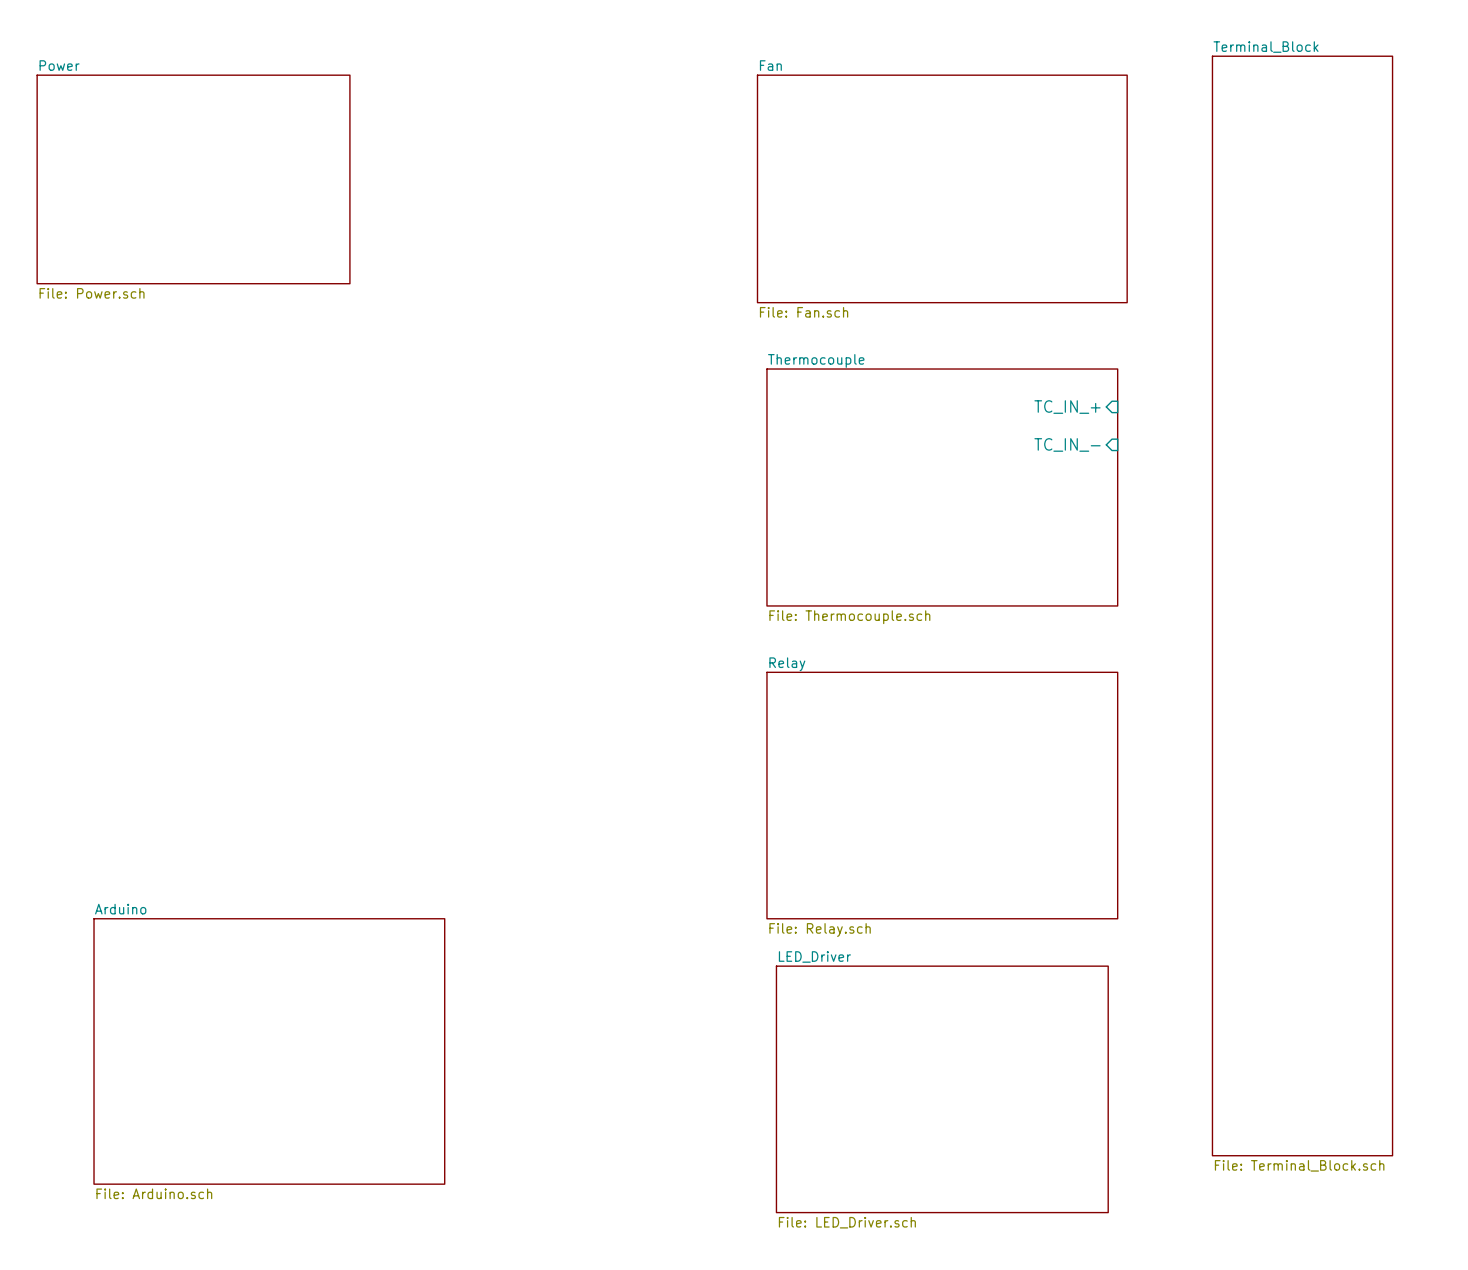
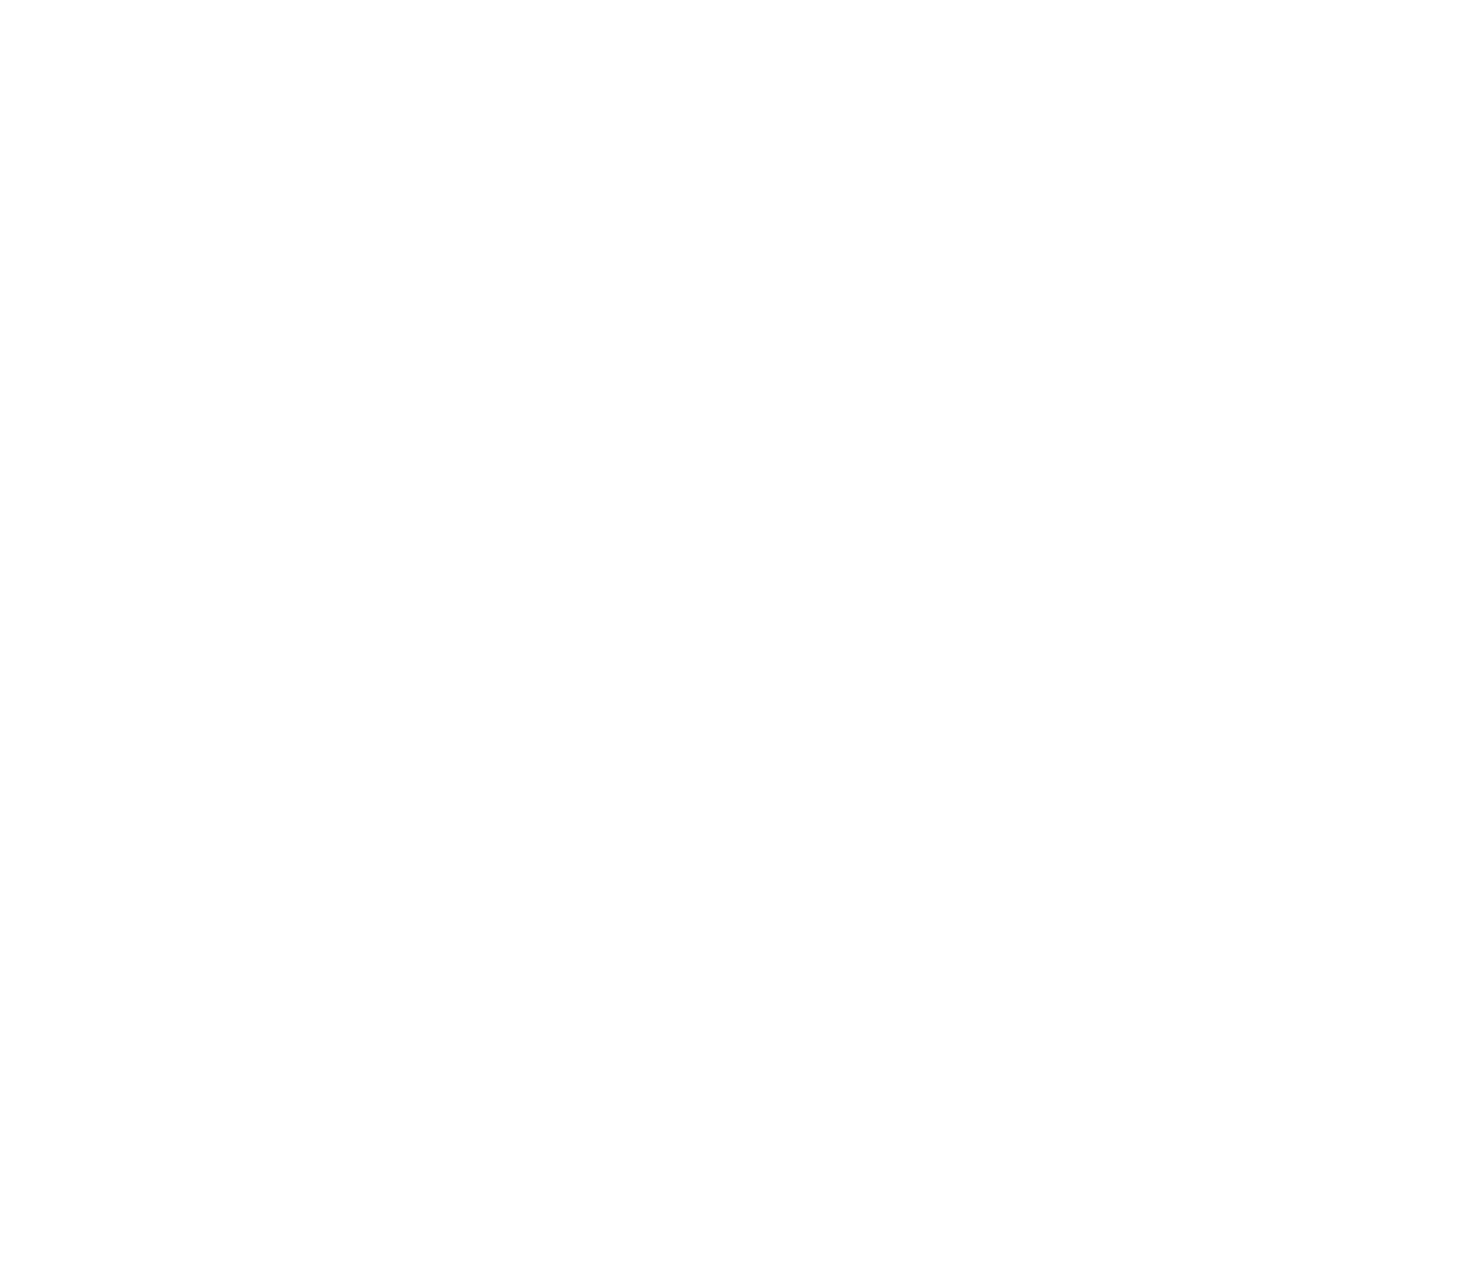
sheet Power: File: Power.sch (193, 179) -> none
sheet Fan: File: Fan.sch (942, 188) -> none
sheet pin: TC_IN_+ (1067, 407) -> none
sheet pin: TC_IN_- (1067, 444) -> none
sheet Thermocouple: File: Thermocouple.sch (942, 487) -> none
sheet Terminal_Block: File: Terminal_Block.sch (1302, 605) -> none
sheet Relay: File: Relay.sch (942, 795) -> none
sheet Arduino: File: Arduino.sch (269, 1051) -> none
sheet LED_Driver: File: LED_Driver.sch (942, 1089) -> none

